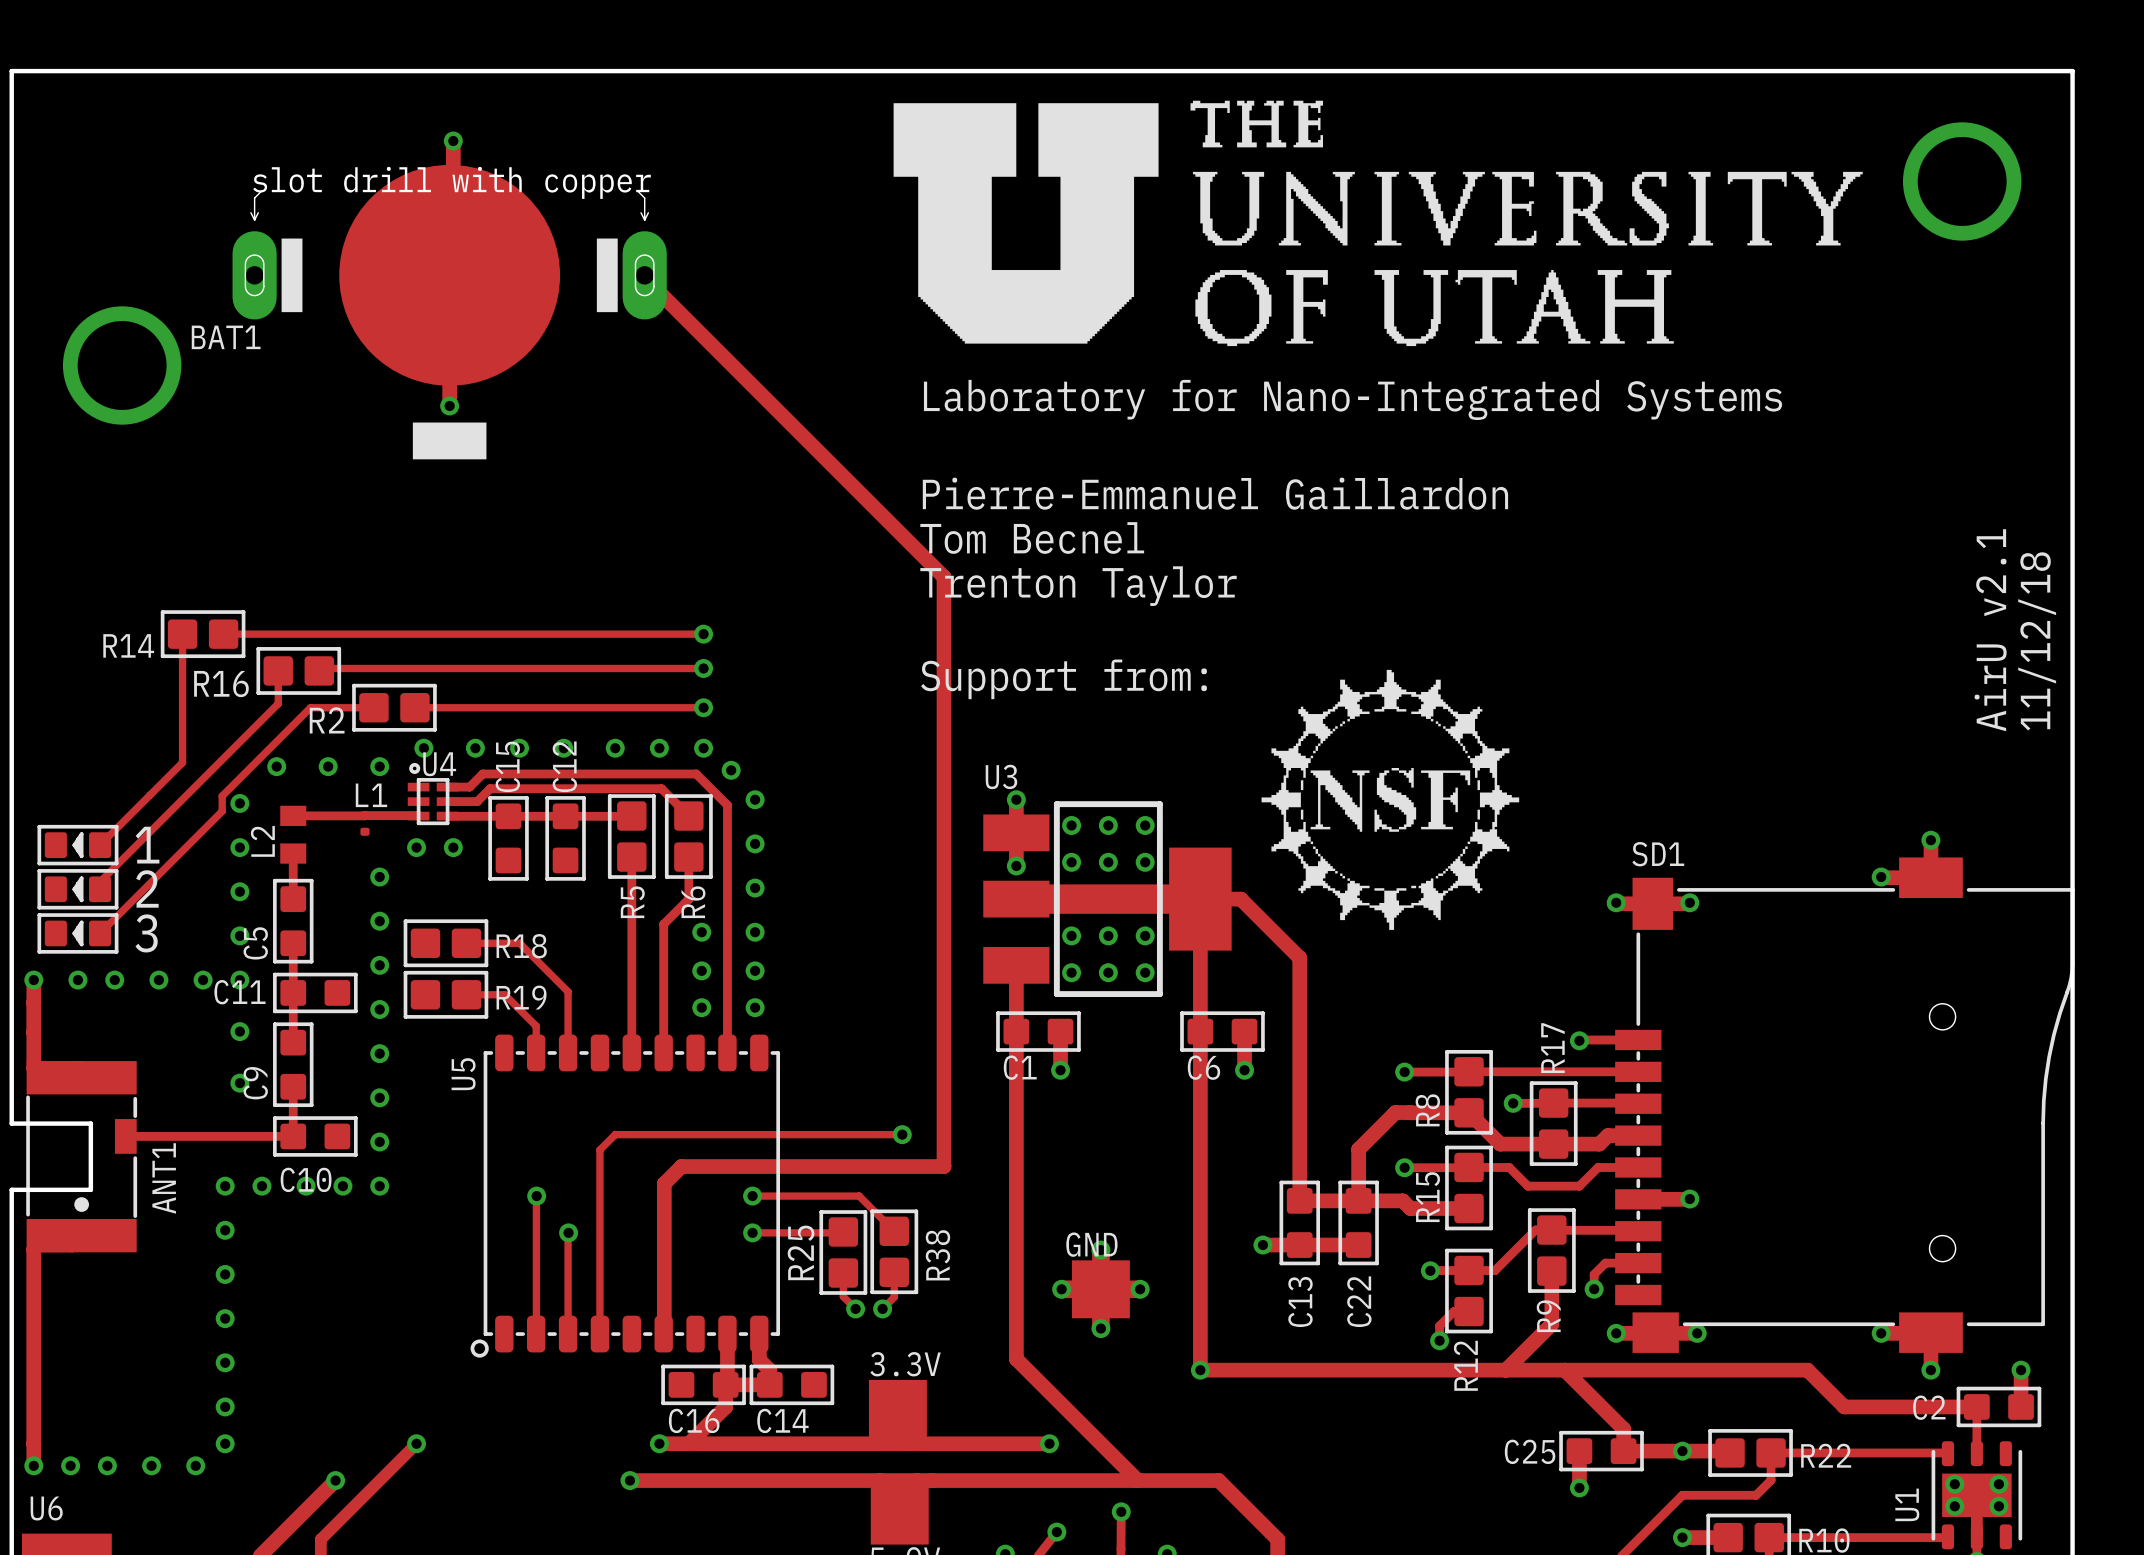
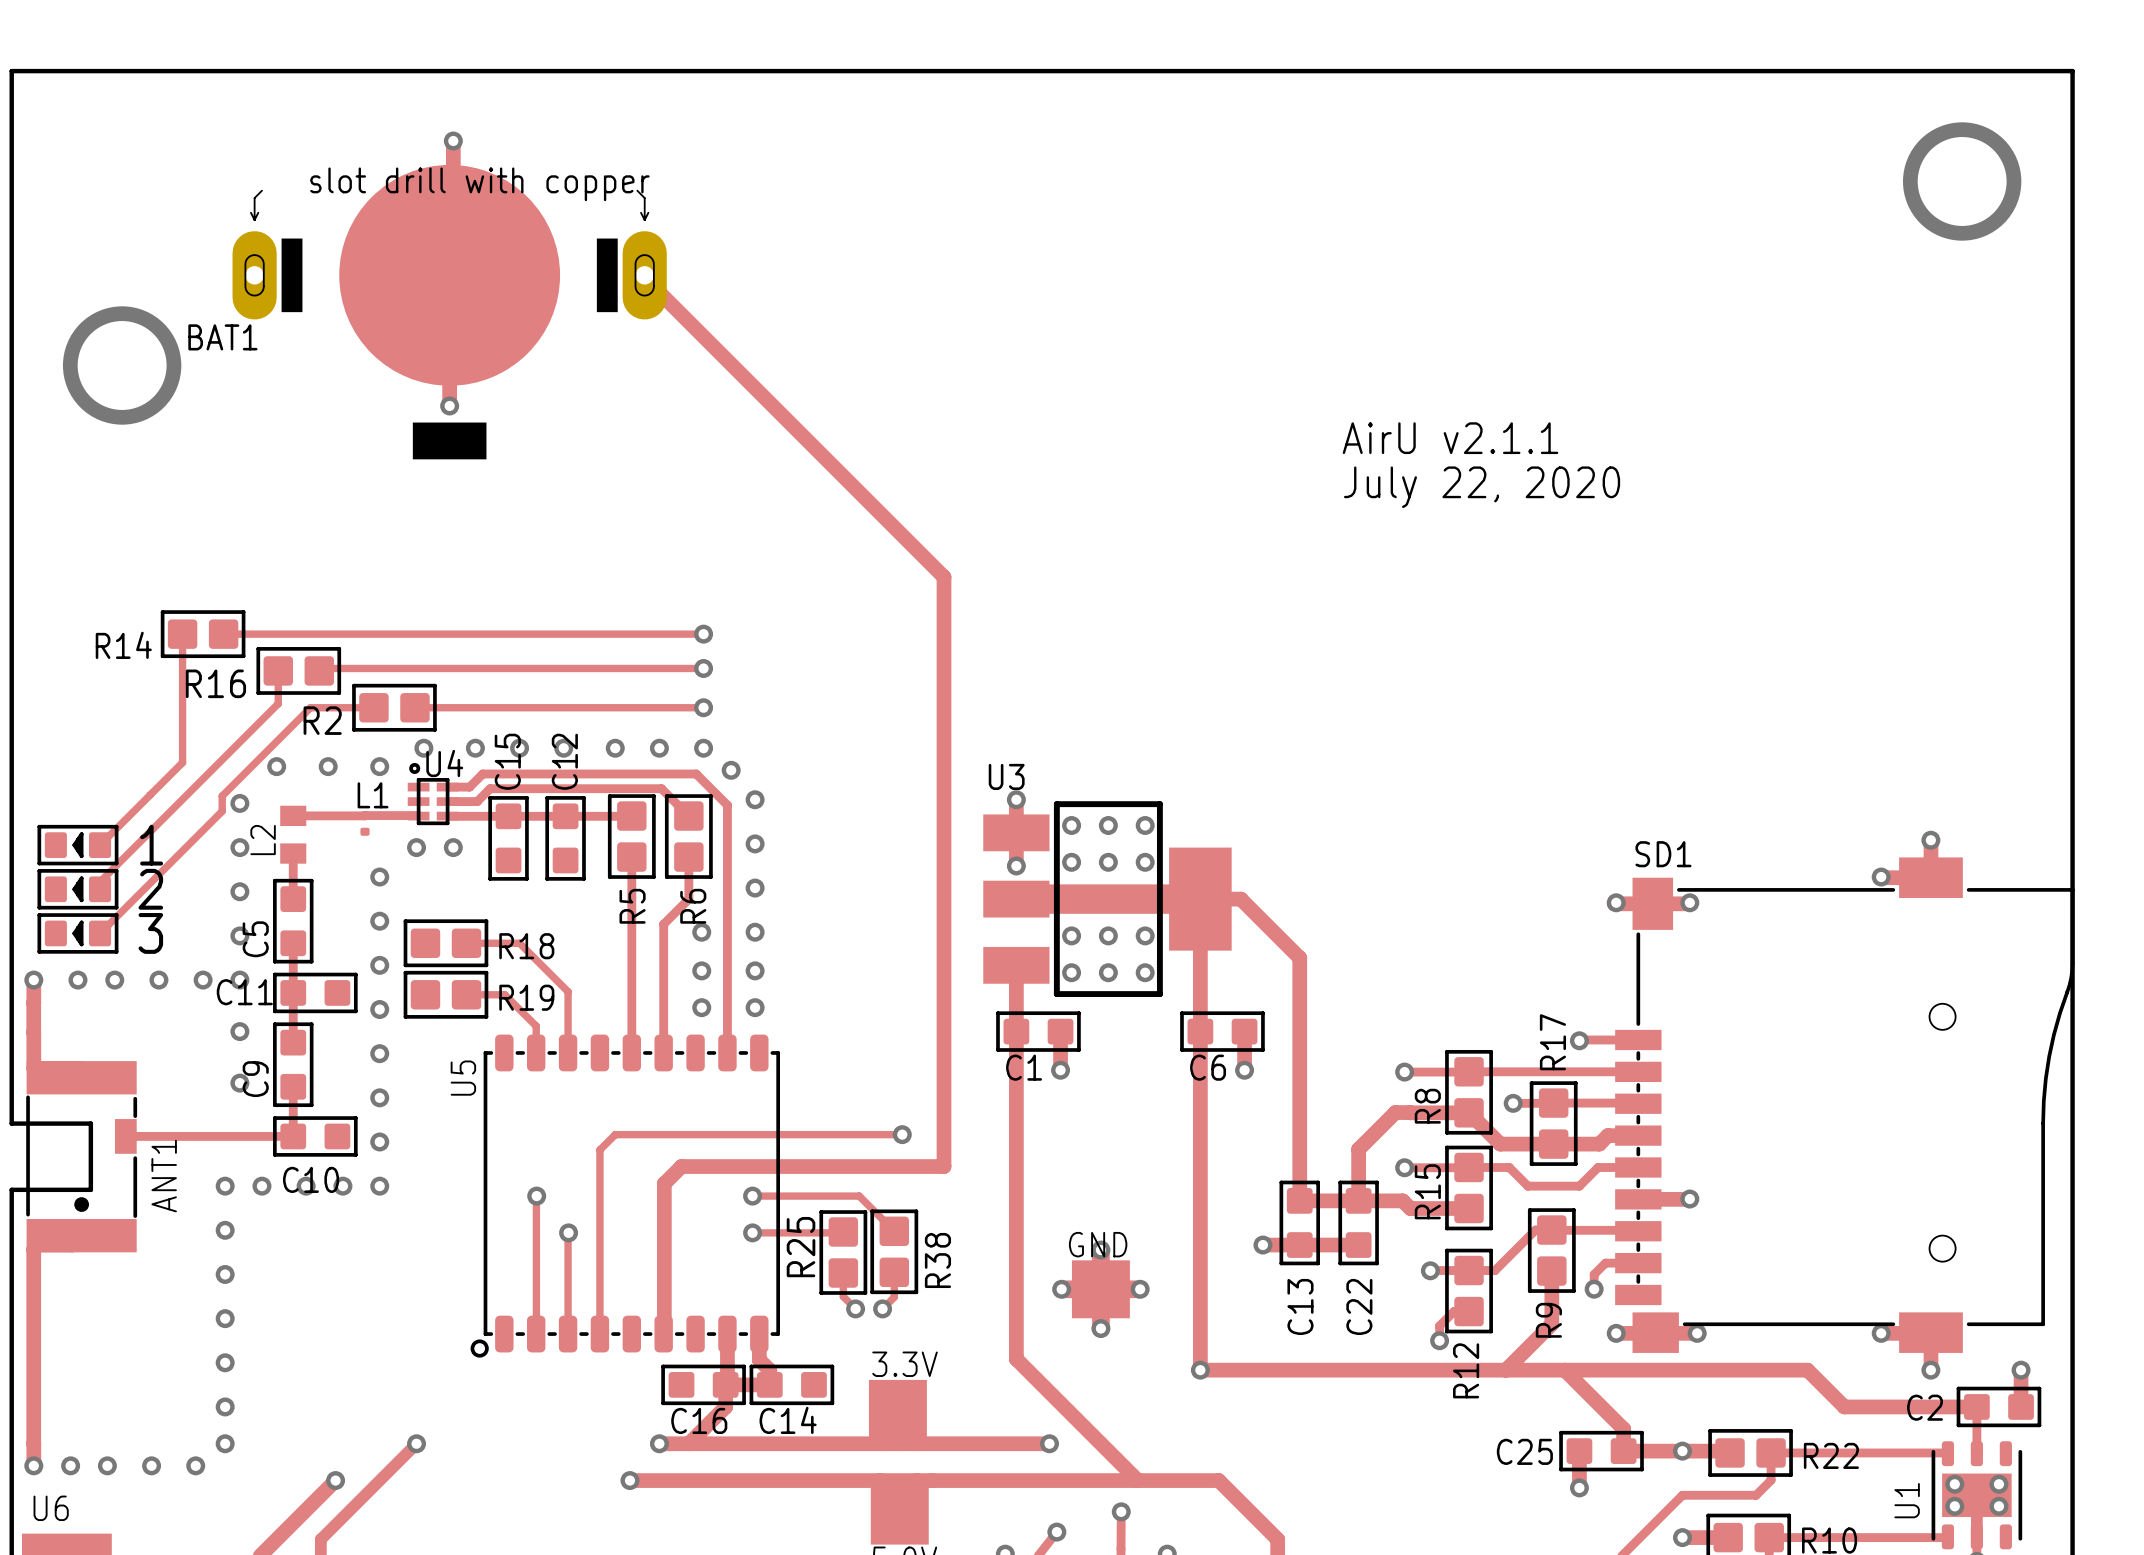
drawing: [893, 100, 1863, 347] -> none
text: Laboratory for Nano-Integrated Systems (1352, 399) -> none
text: none -> AirU v2.1.1 (1450, 438)
text: none -> July 22, 2020 (1482, 487)
text: Pierre-Emmanuel Gaillardon (1215, 493) -> none
text: Tom Becnel (1032, 538) -> none
text: Trenton Taylor (1078, 586) -> none
text: AirU v2.1 (1990, 630) -> none
text: 11/12/18 (2037, 641) -> none
drawing: [1261, 669, 1520, 930] -> none
text: Support from: (1064, 679) -> none

